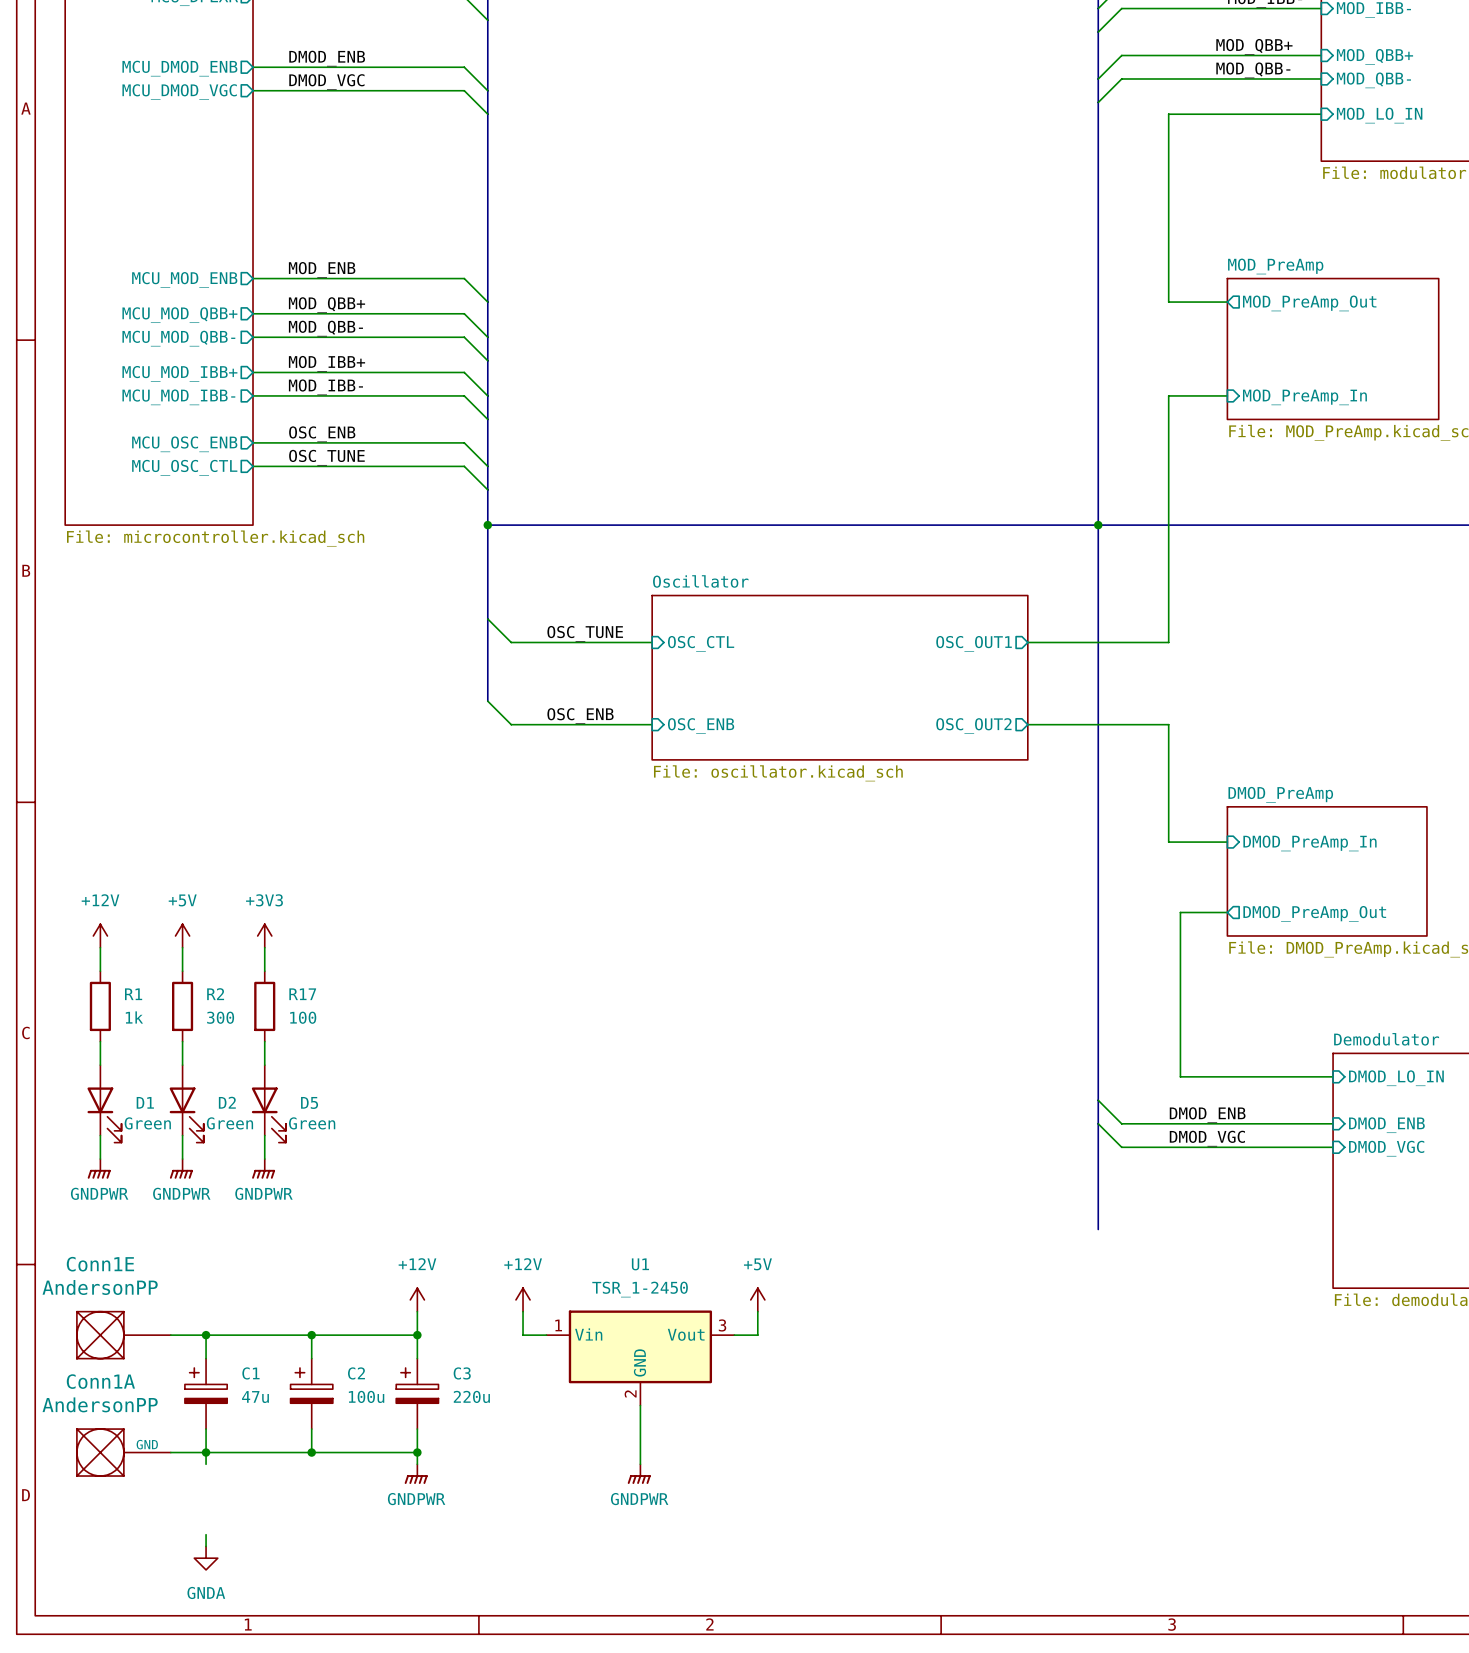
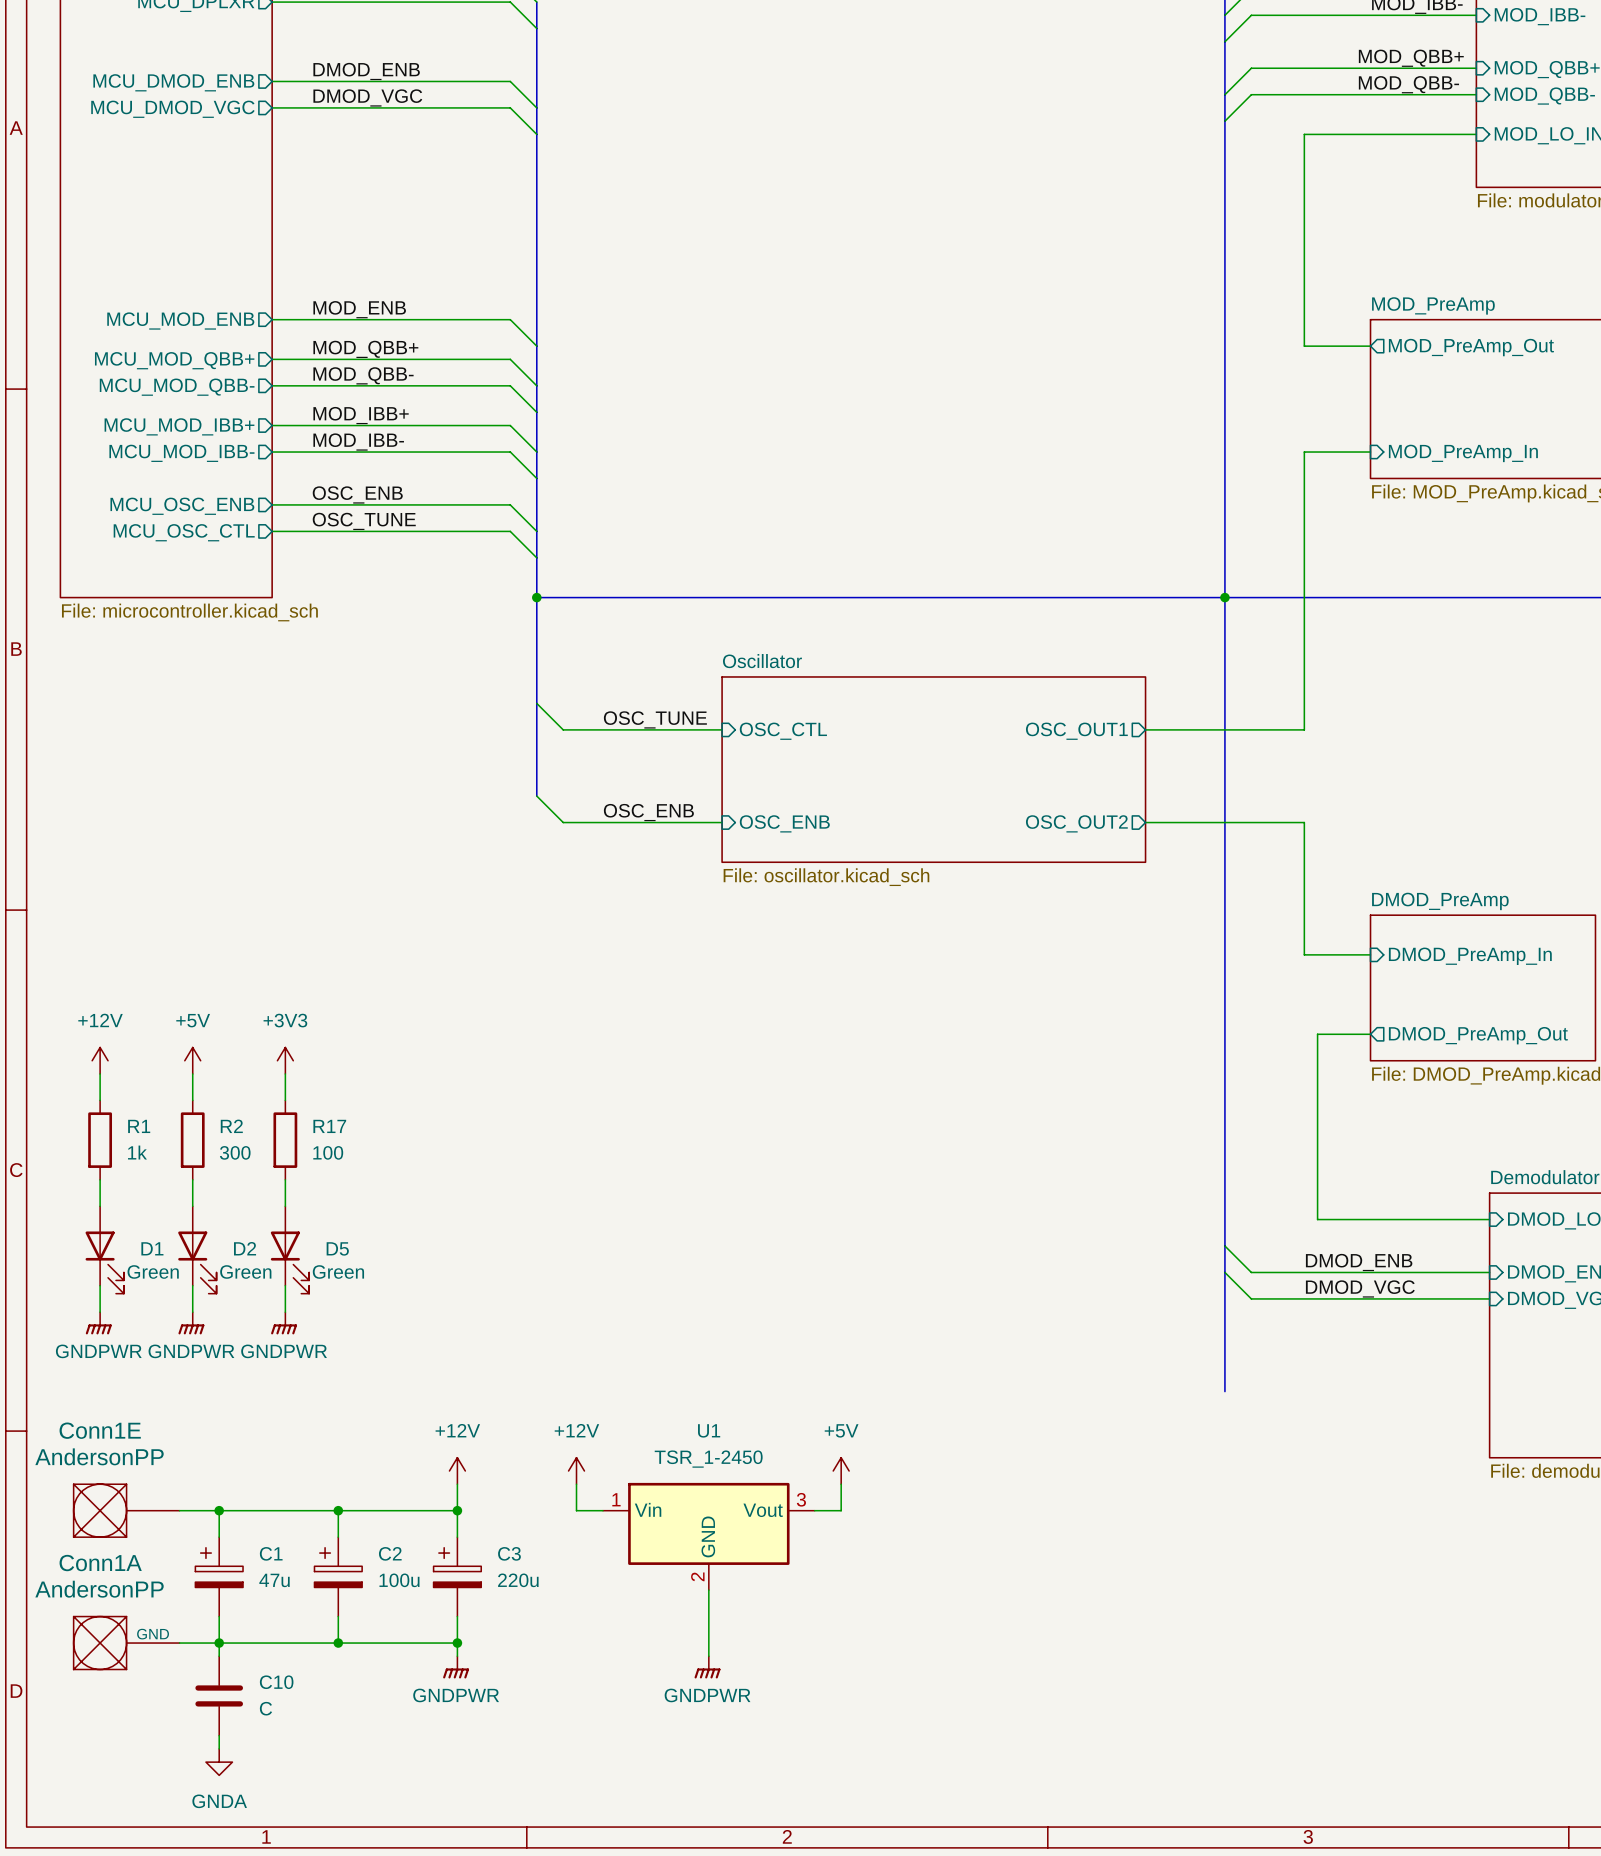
C10: none -> C (219, 1695)

